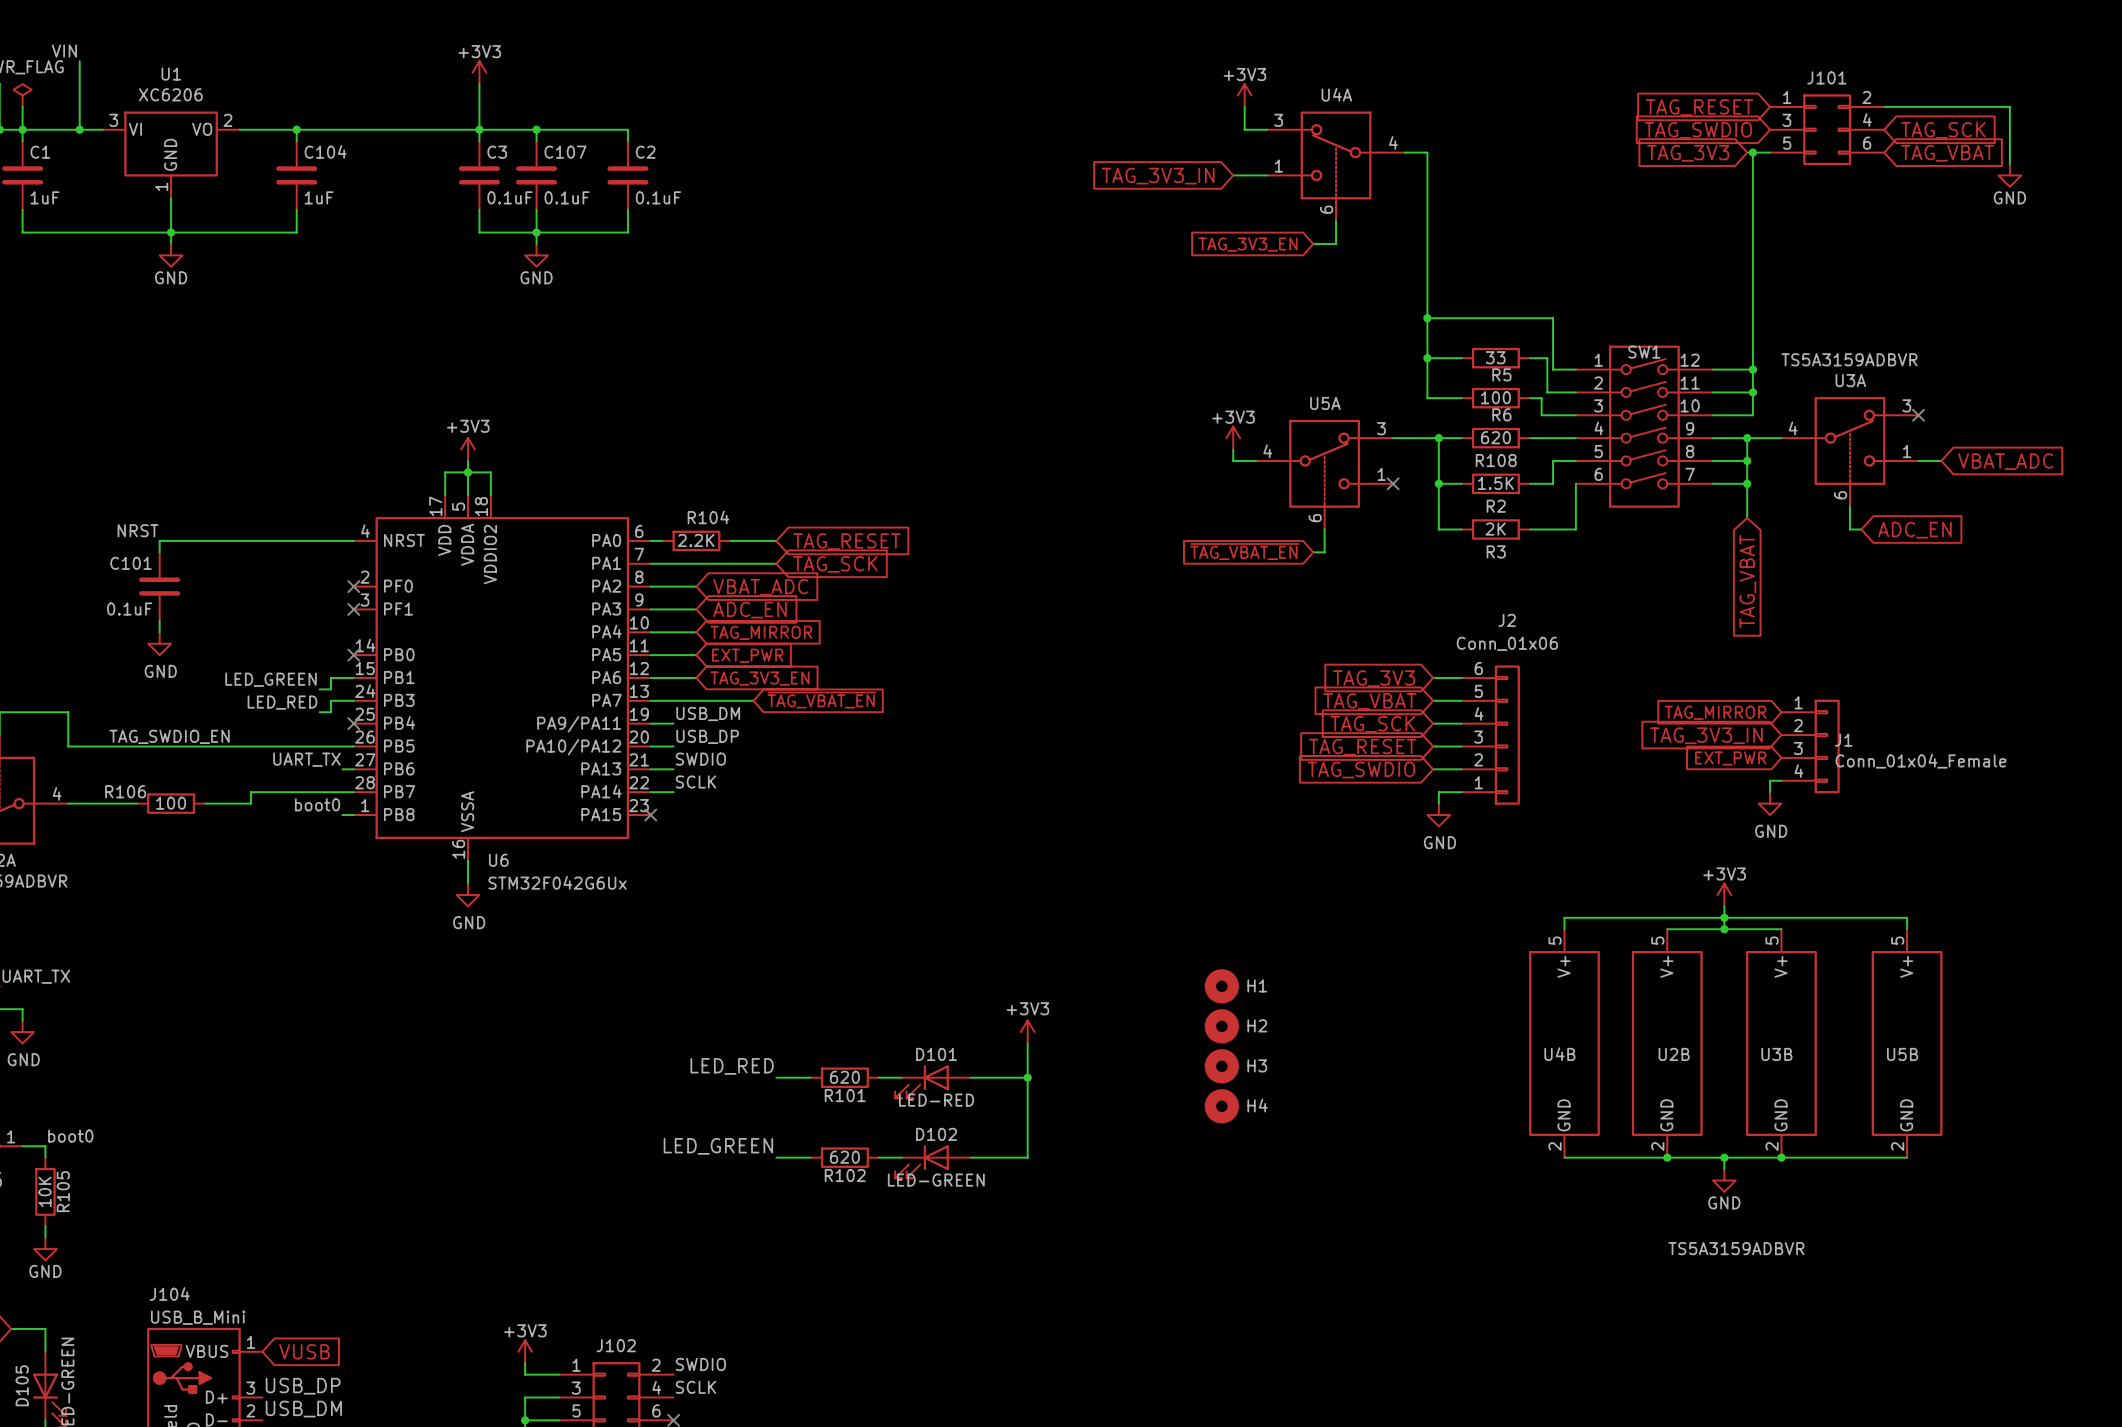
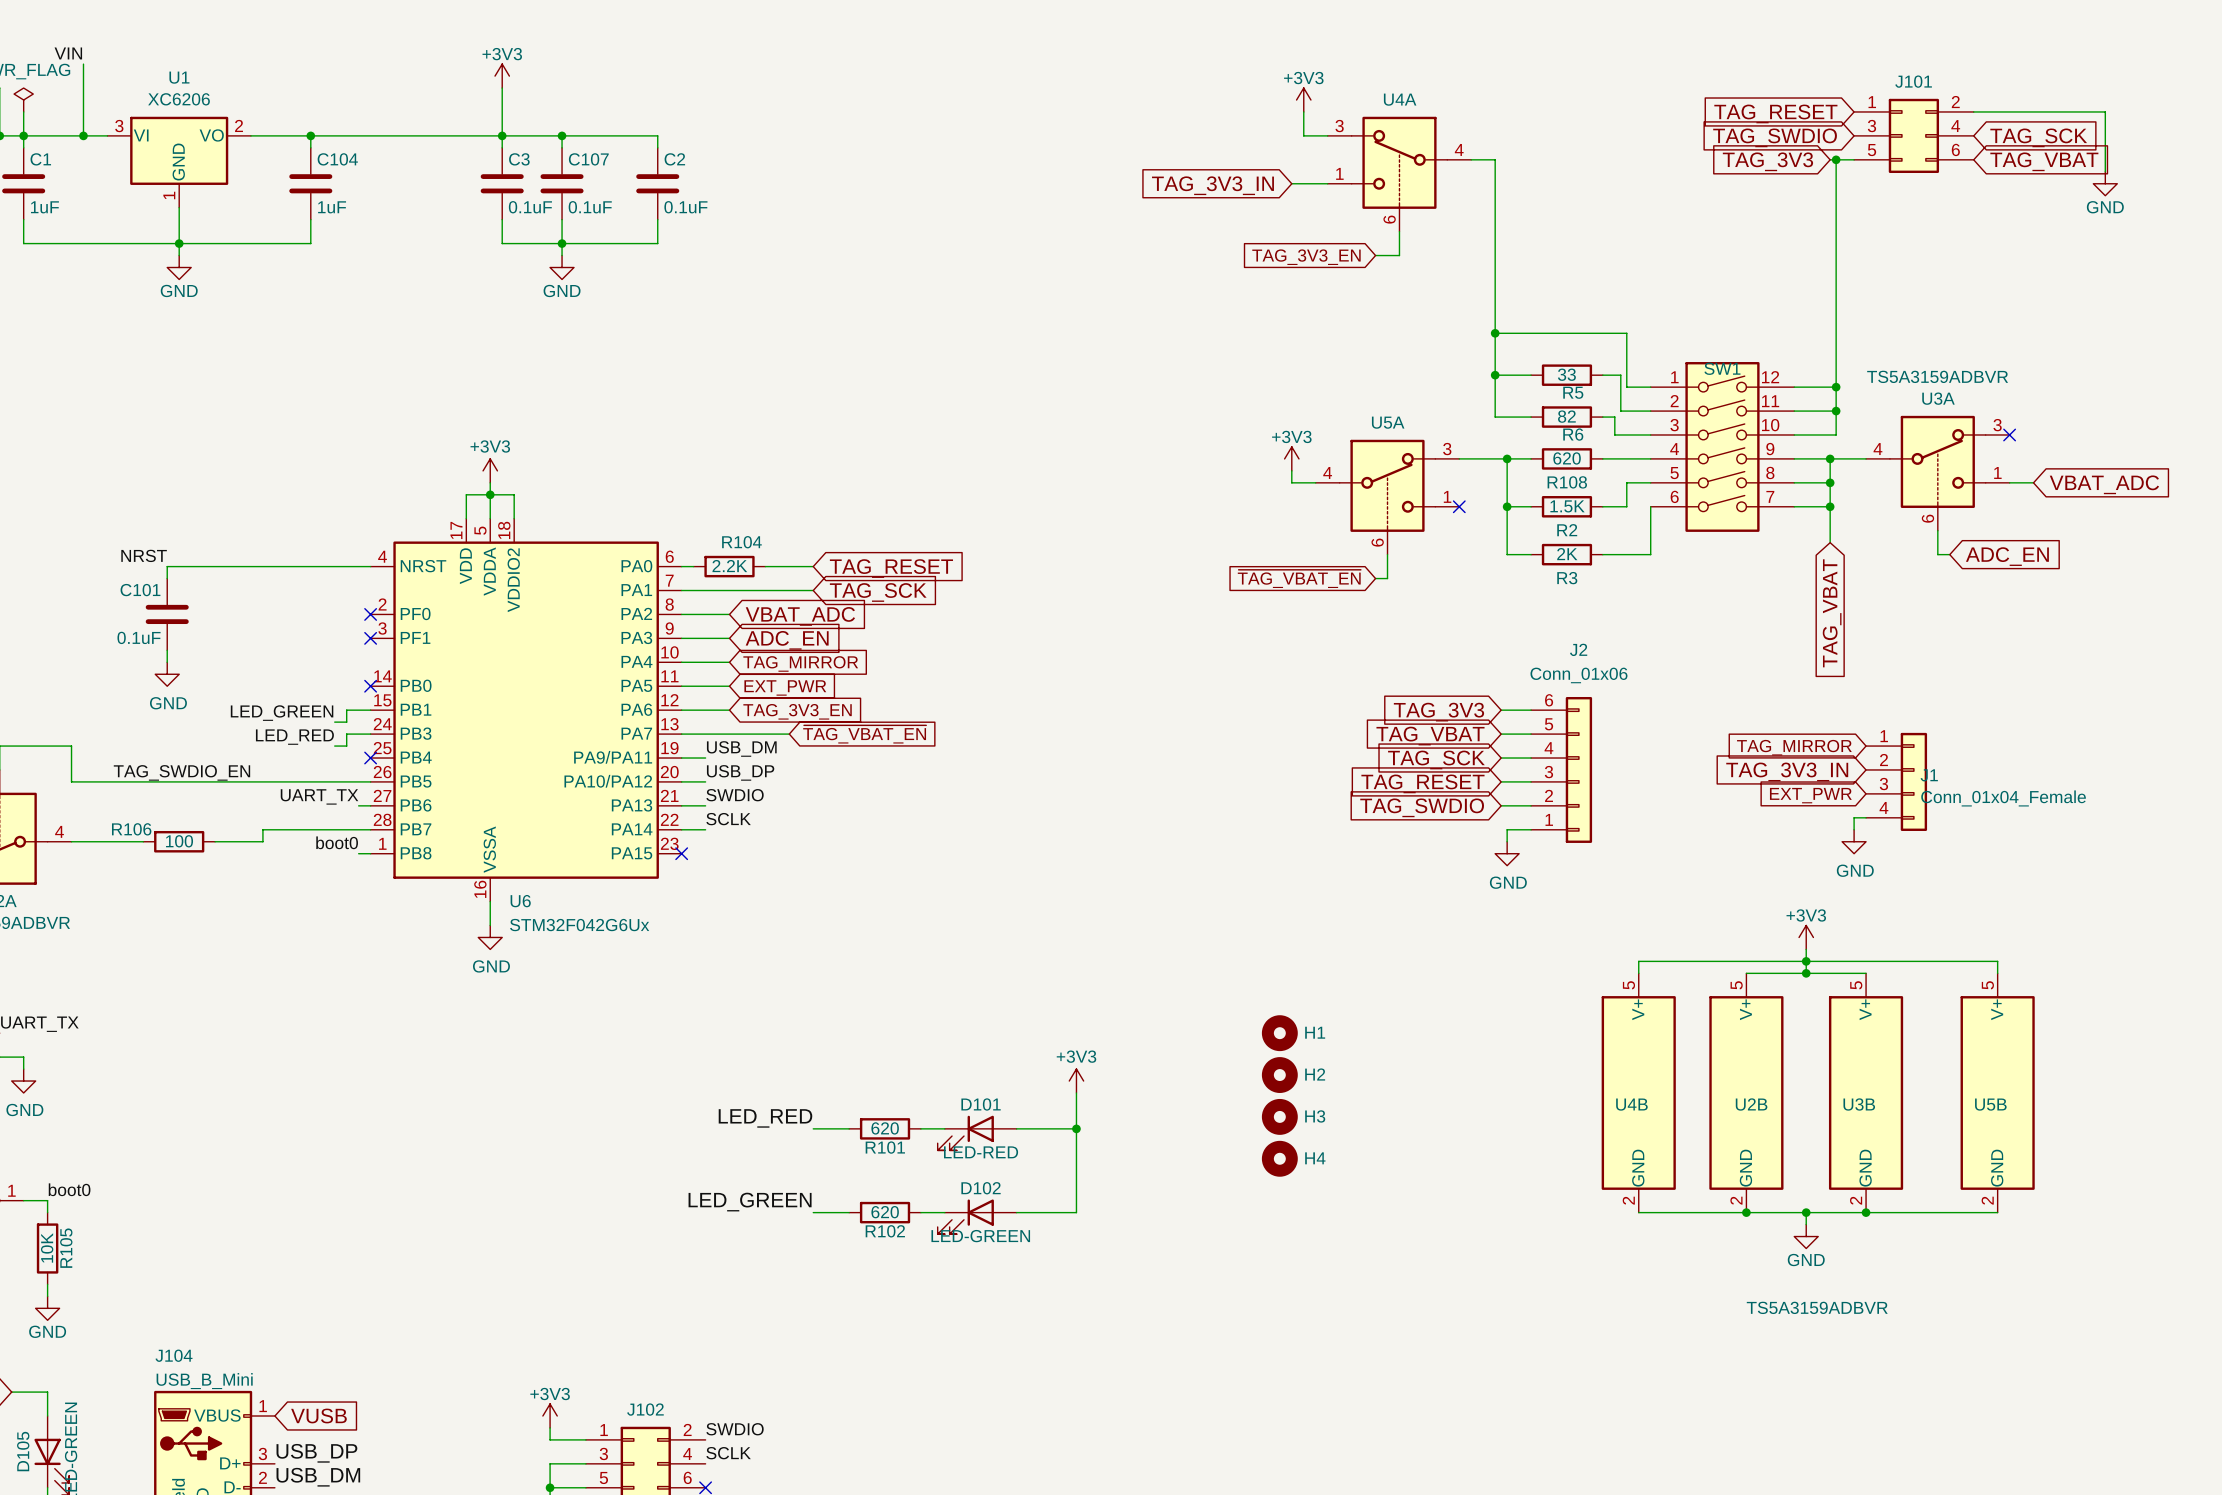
R6 value: 100 (1495, 397) -> 82 (1566, 416)

